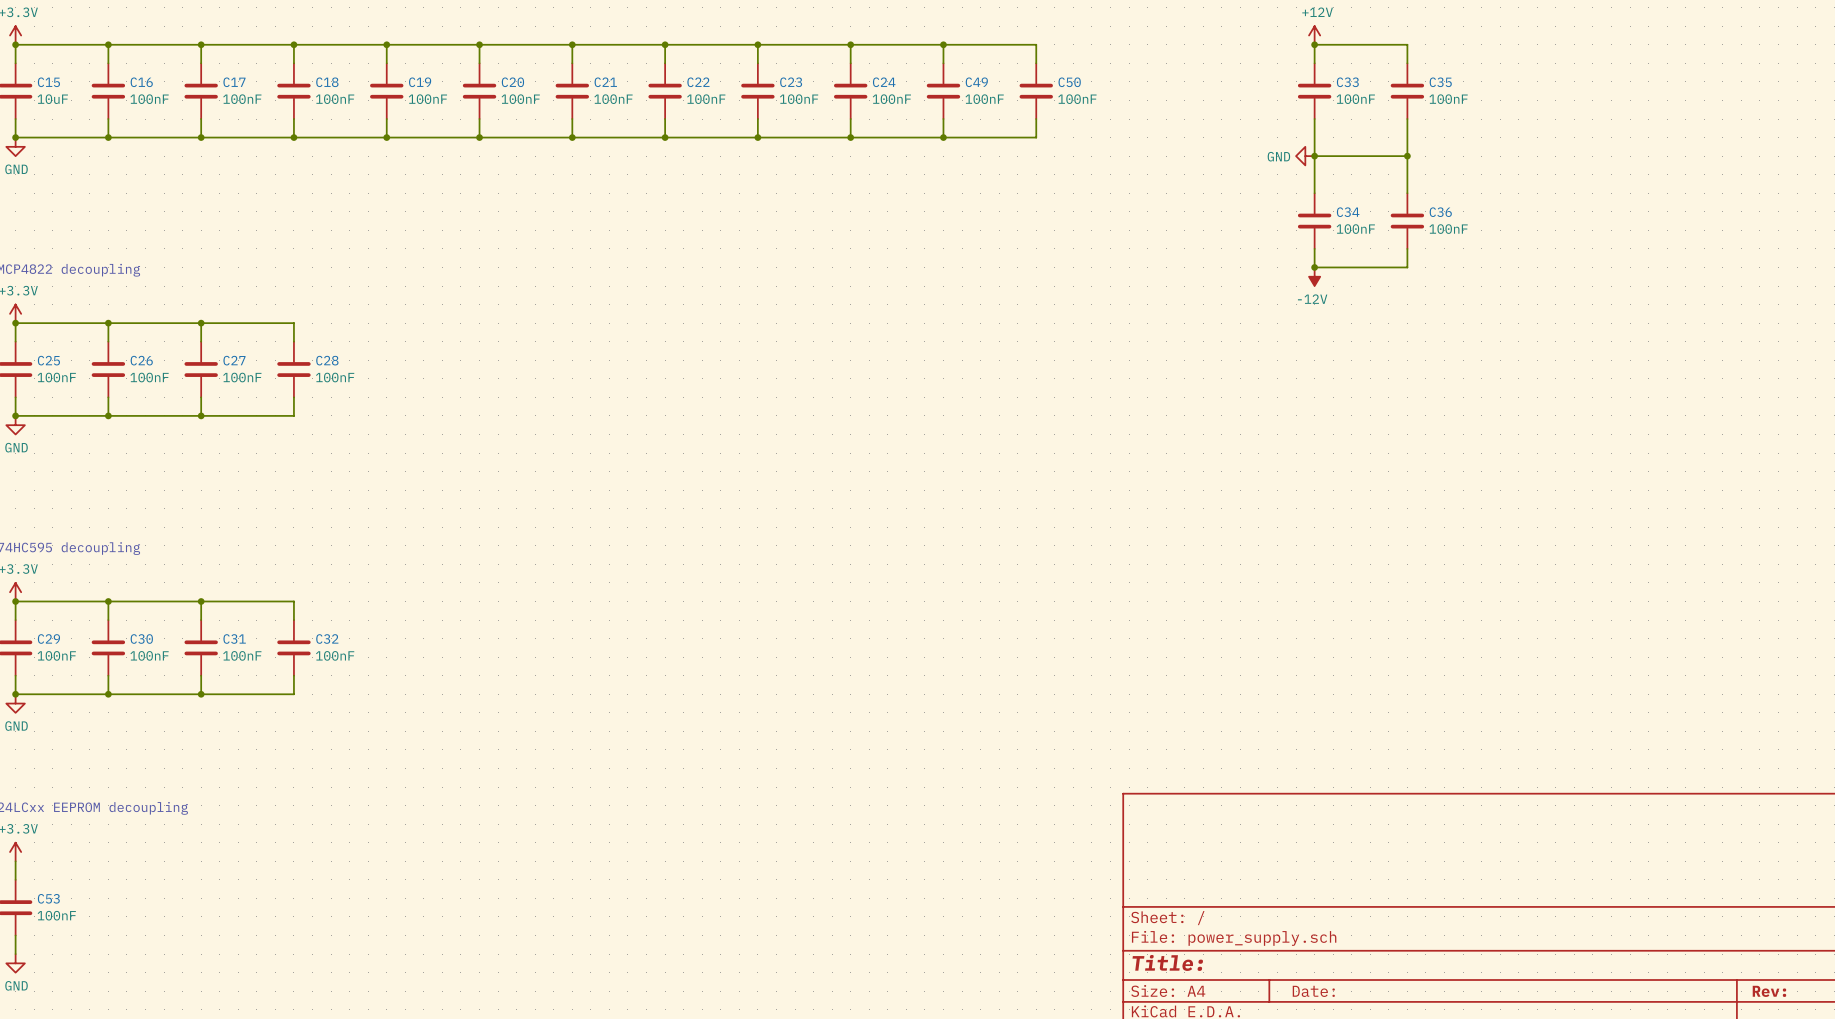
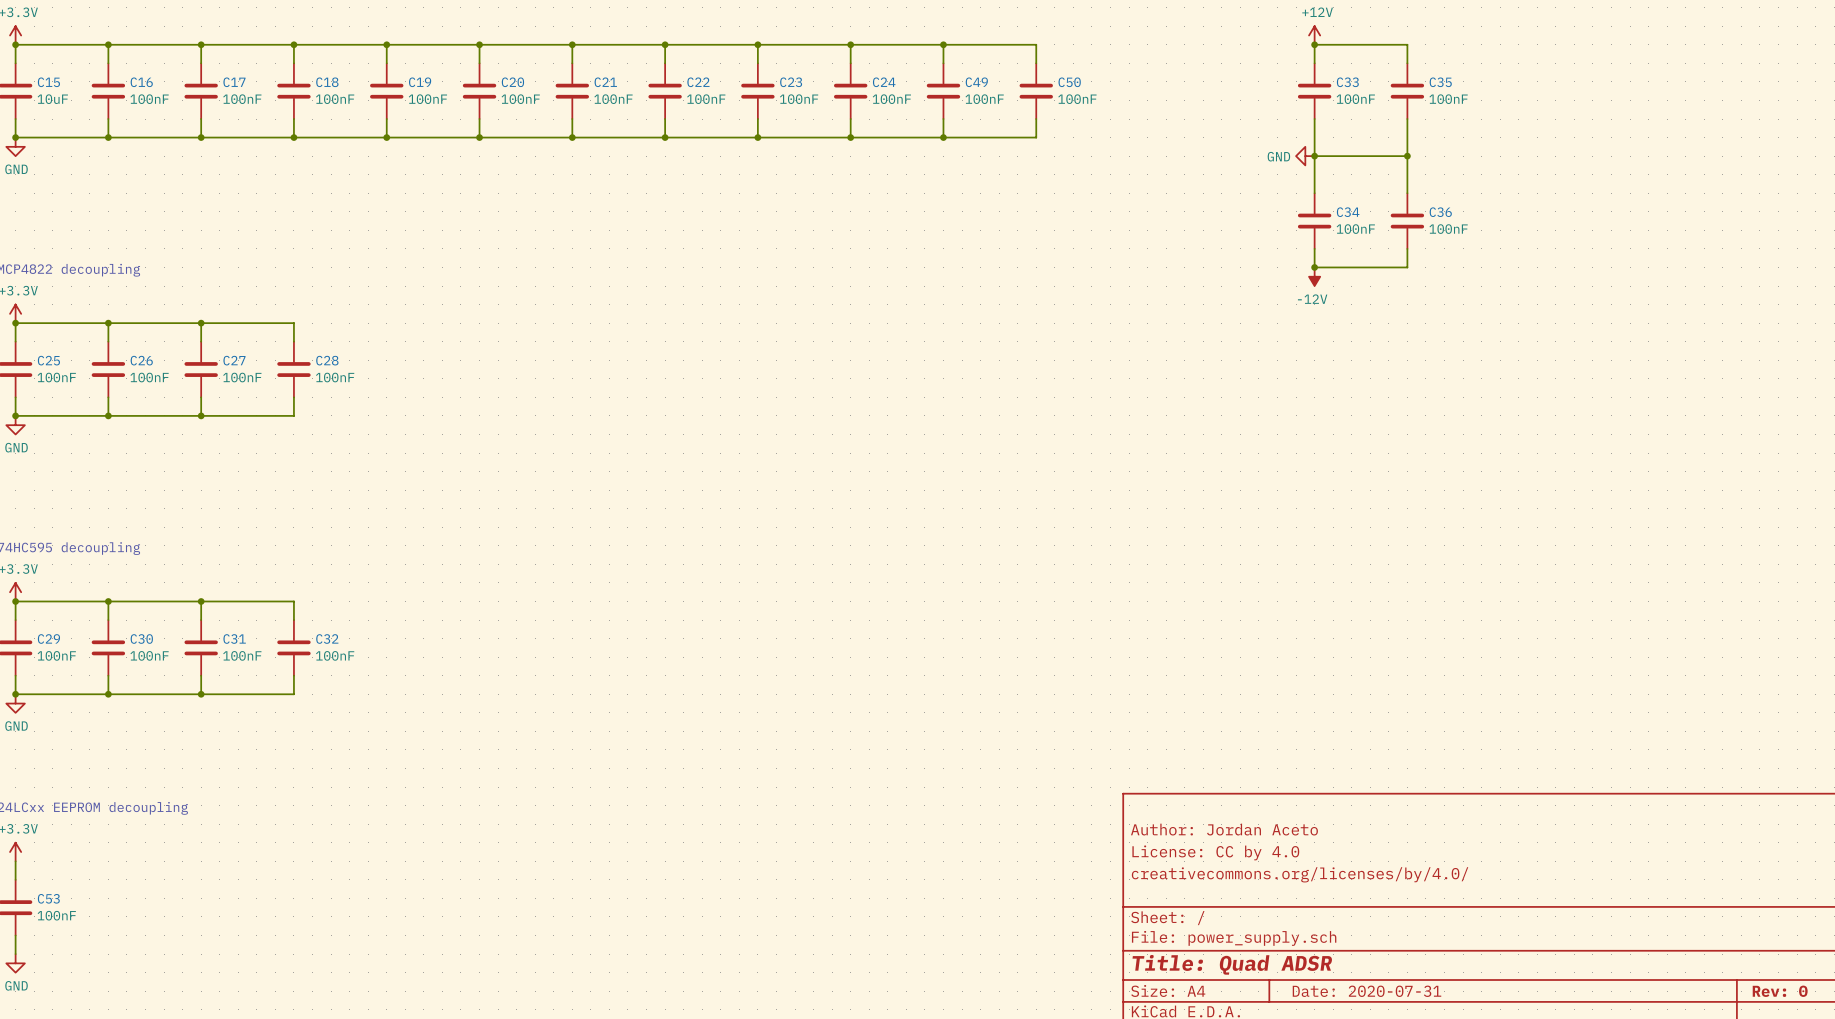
title block: none -> Author: Jordan Aceto (1224, 829)
title block: none -> License: CC by 4.0 (1215, 852)
title block: none -> creativecommons.org/licenses/by/4.0/ (1300, 874)
title block: Title: (1167, 962) -> Title: Quad ADSR (1232, 964)
title block: Date: (1313, 991) -> Date: 2020-07-31 (1366, 991)
title block: Rev: (1769, 991) -> Rev: 0 (1780, 991)

